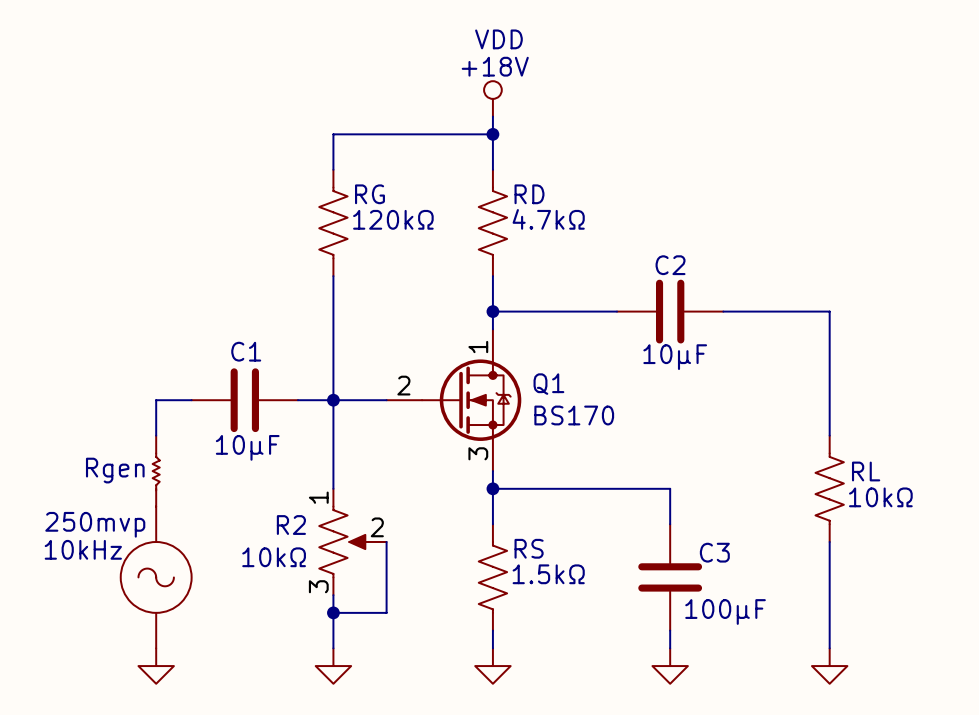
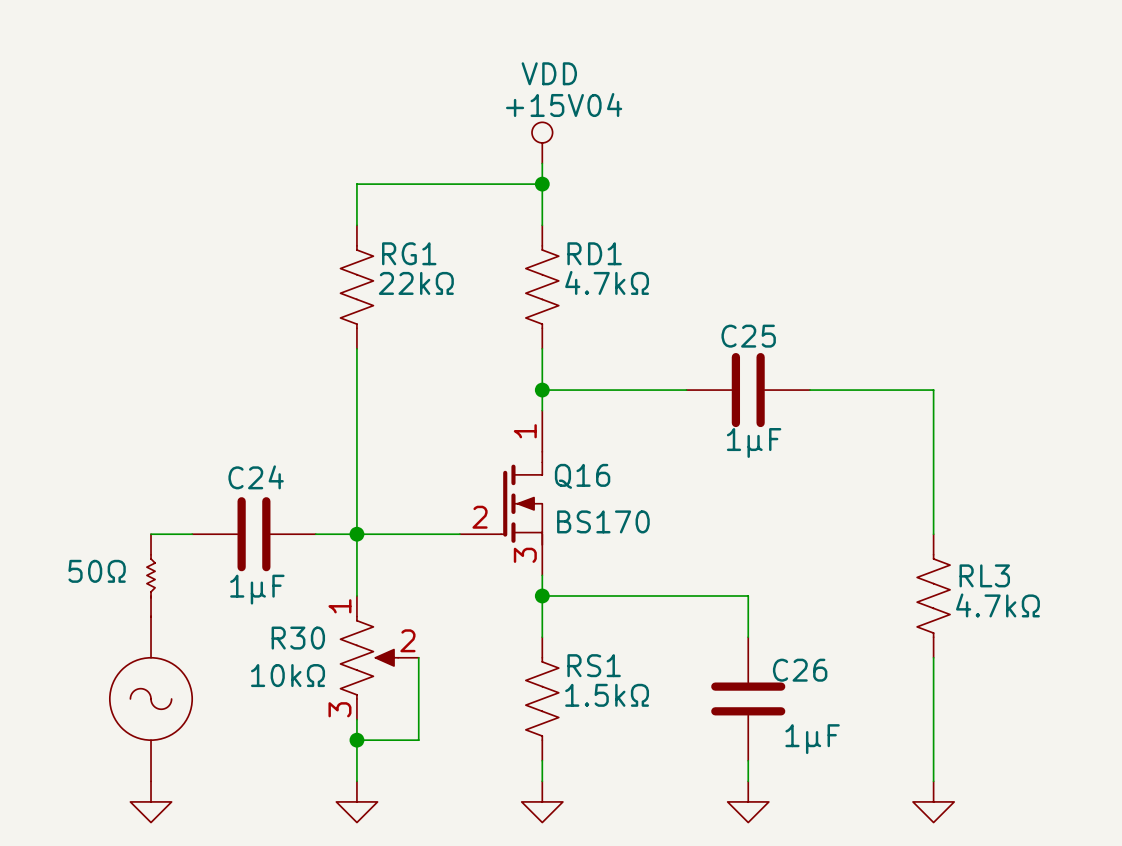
+18V name: +18V (495, 66) -> +15V04 (564, 105)
RG name: RG (369, 194) -> RG1 (409, 253)
RD name: RD (529, 194) -> RD1 (594, 253)
RG value: 120kΩ (393, 219) -> 22kΩ (416, 283)
C2 name: C2 (670, 265) -> C25 (748, 336)
C2 value: 10µF (675, 357) -> 1µF (754, 442)
wire: (191, 400) (156, 400) (156, 435) -> (192, 534) (151, 534)
C1: 10µF (244, 400) -> none
wire: (297, 400) (386, 400) -> none
junction position: (333, 400) -> (356, 534)
Q1: BS170 (453, 400) -> none
Q16: none -> BS170 (501, 493)
C24: none -> 1µF (253, 534)
wire: none -> (315, 534) (459, 534)
part value: Rgen (115, 470) -> 50Ω (97, 571)
RL name: RL (866, 471) -> RL3 (984, 575)
RL value: 10kΩ (880, 497) -> 4.7kΩ (997, 605)
10kHz value: 250mvp (95, 524) -> none
R2 name: R2 (291, 525) -> R30 (298, 638)
RS name: RS (529, 548) -> RS1 (594, 665)
10kHz name: 10kHz (83, 549) -> none
C3 name: C3 (714, 552) -> C26 (800, 670)
C3 value: 100µF (725, 611) -> 1µF (812, 739)

